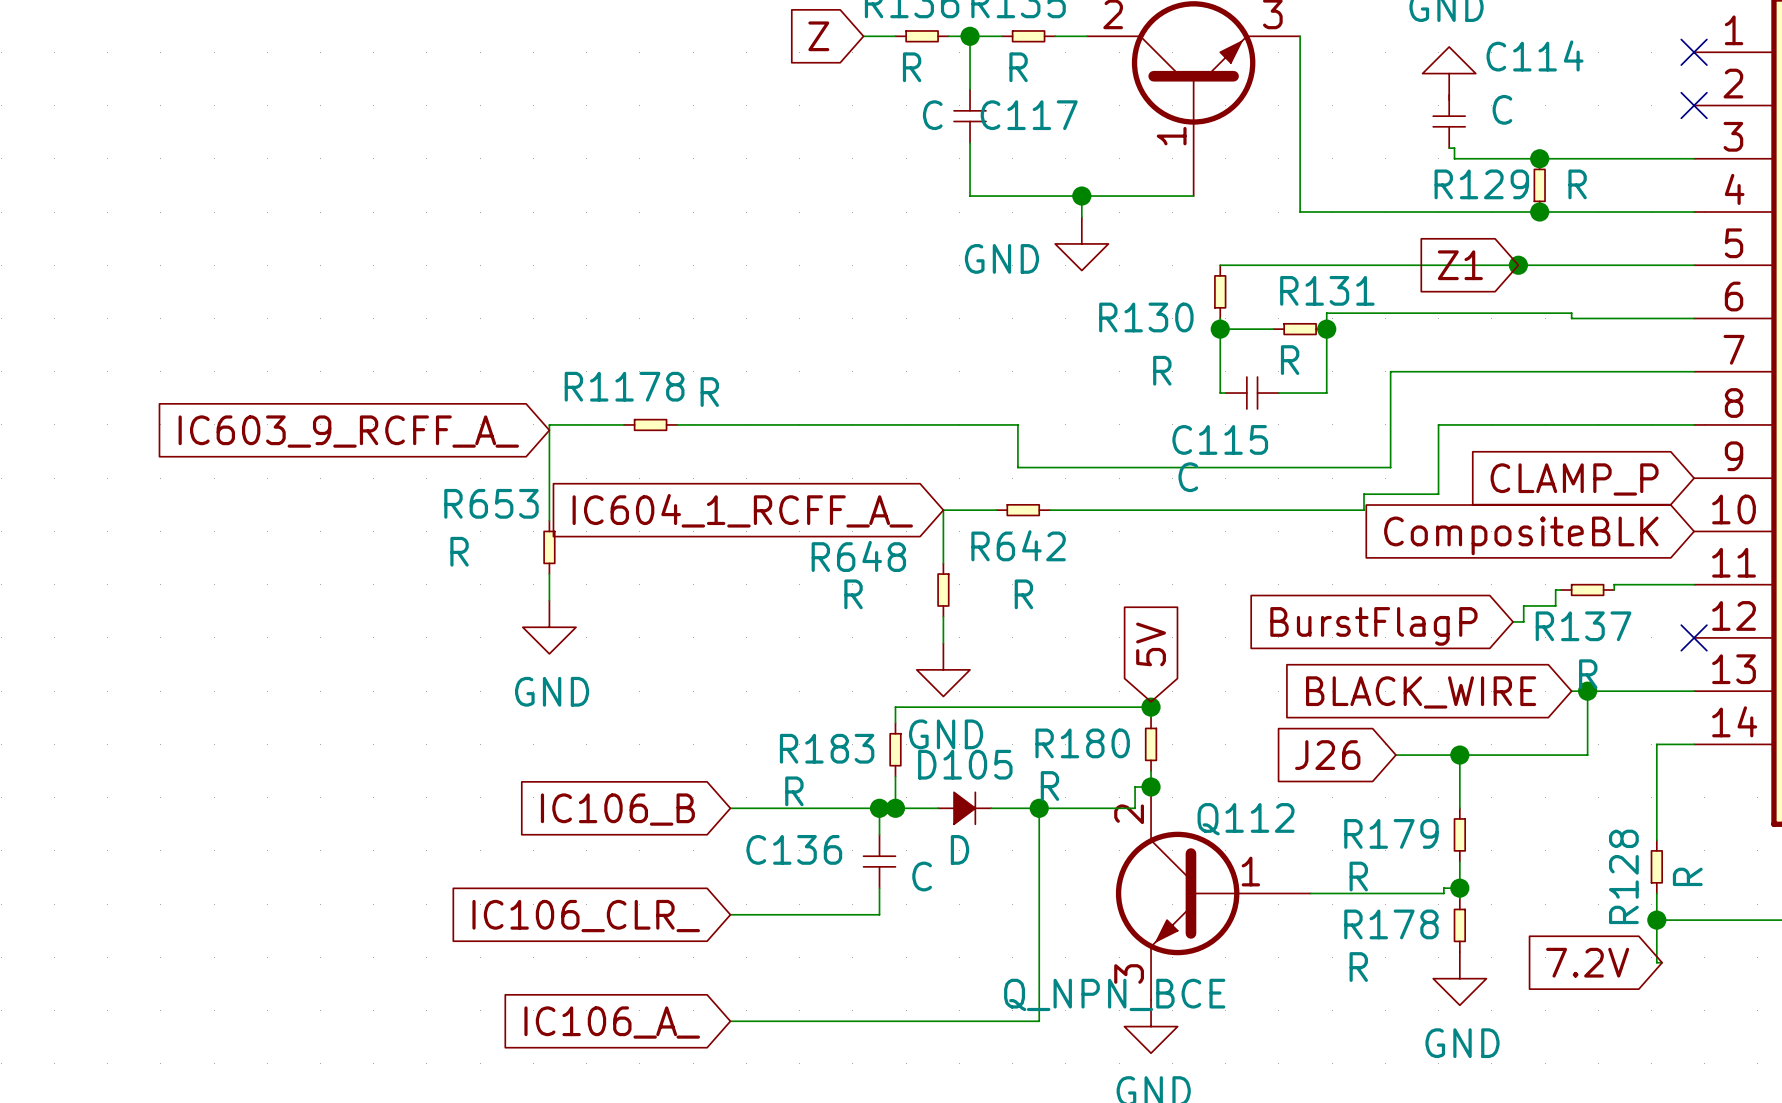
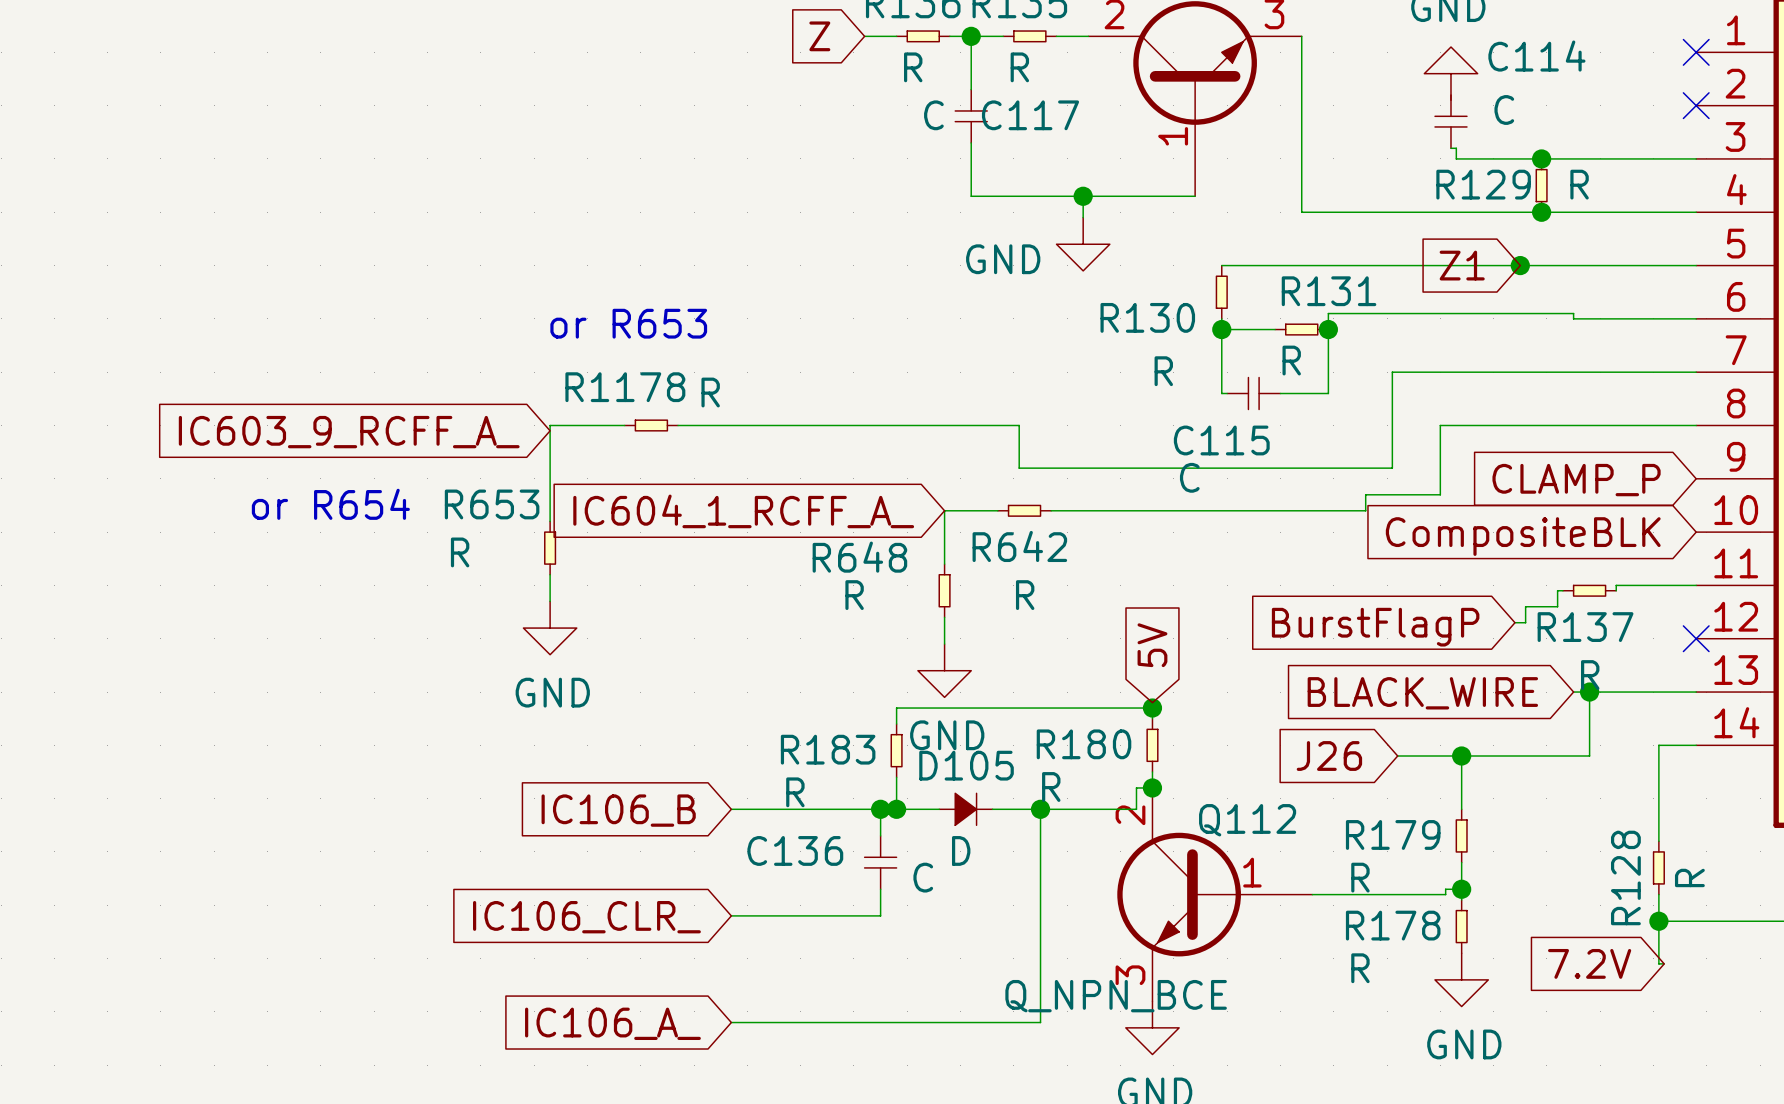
text: none -> or R653 (628, 323)
text: none -> or R654 (330, 504)

